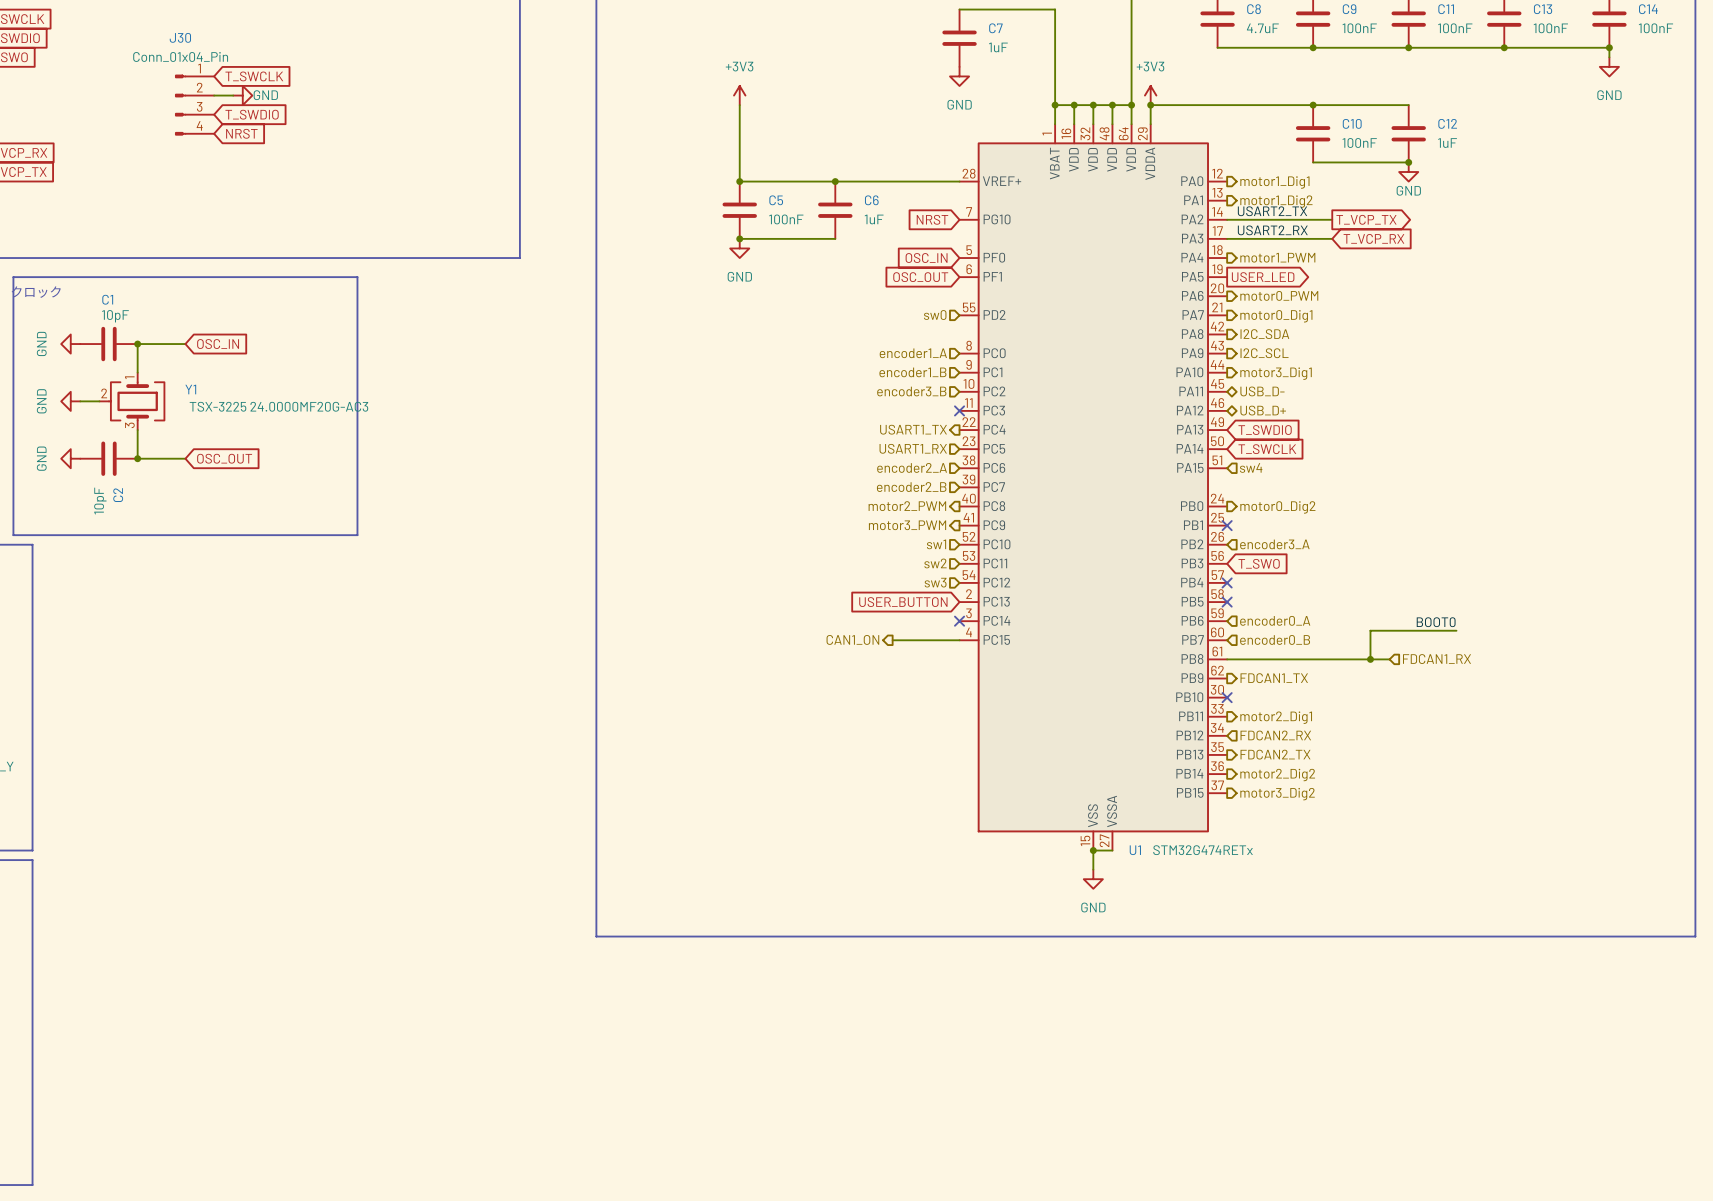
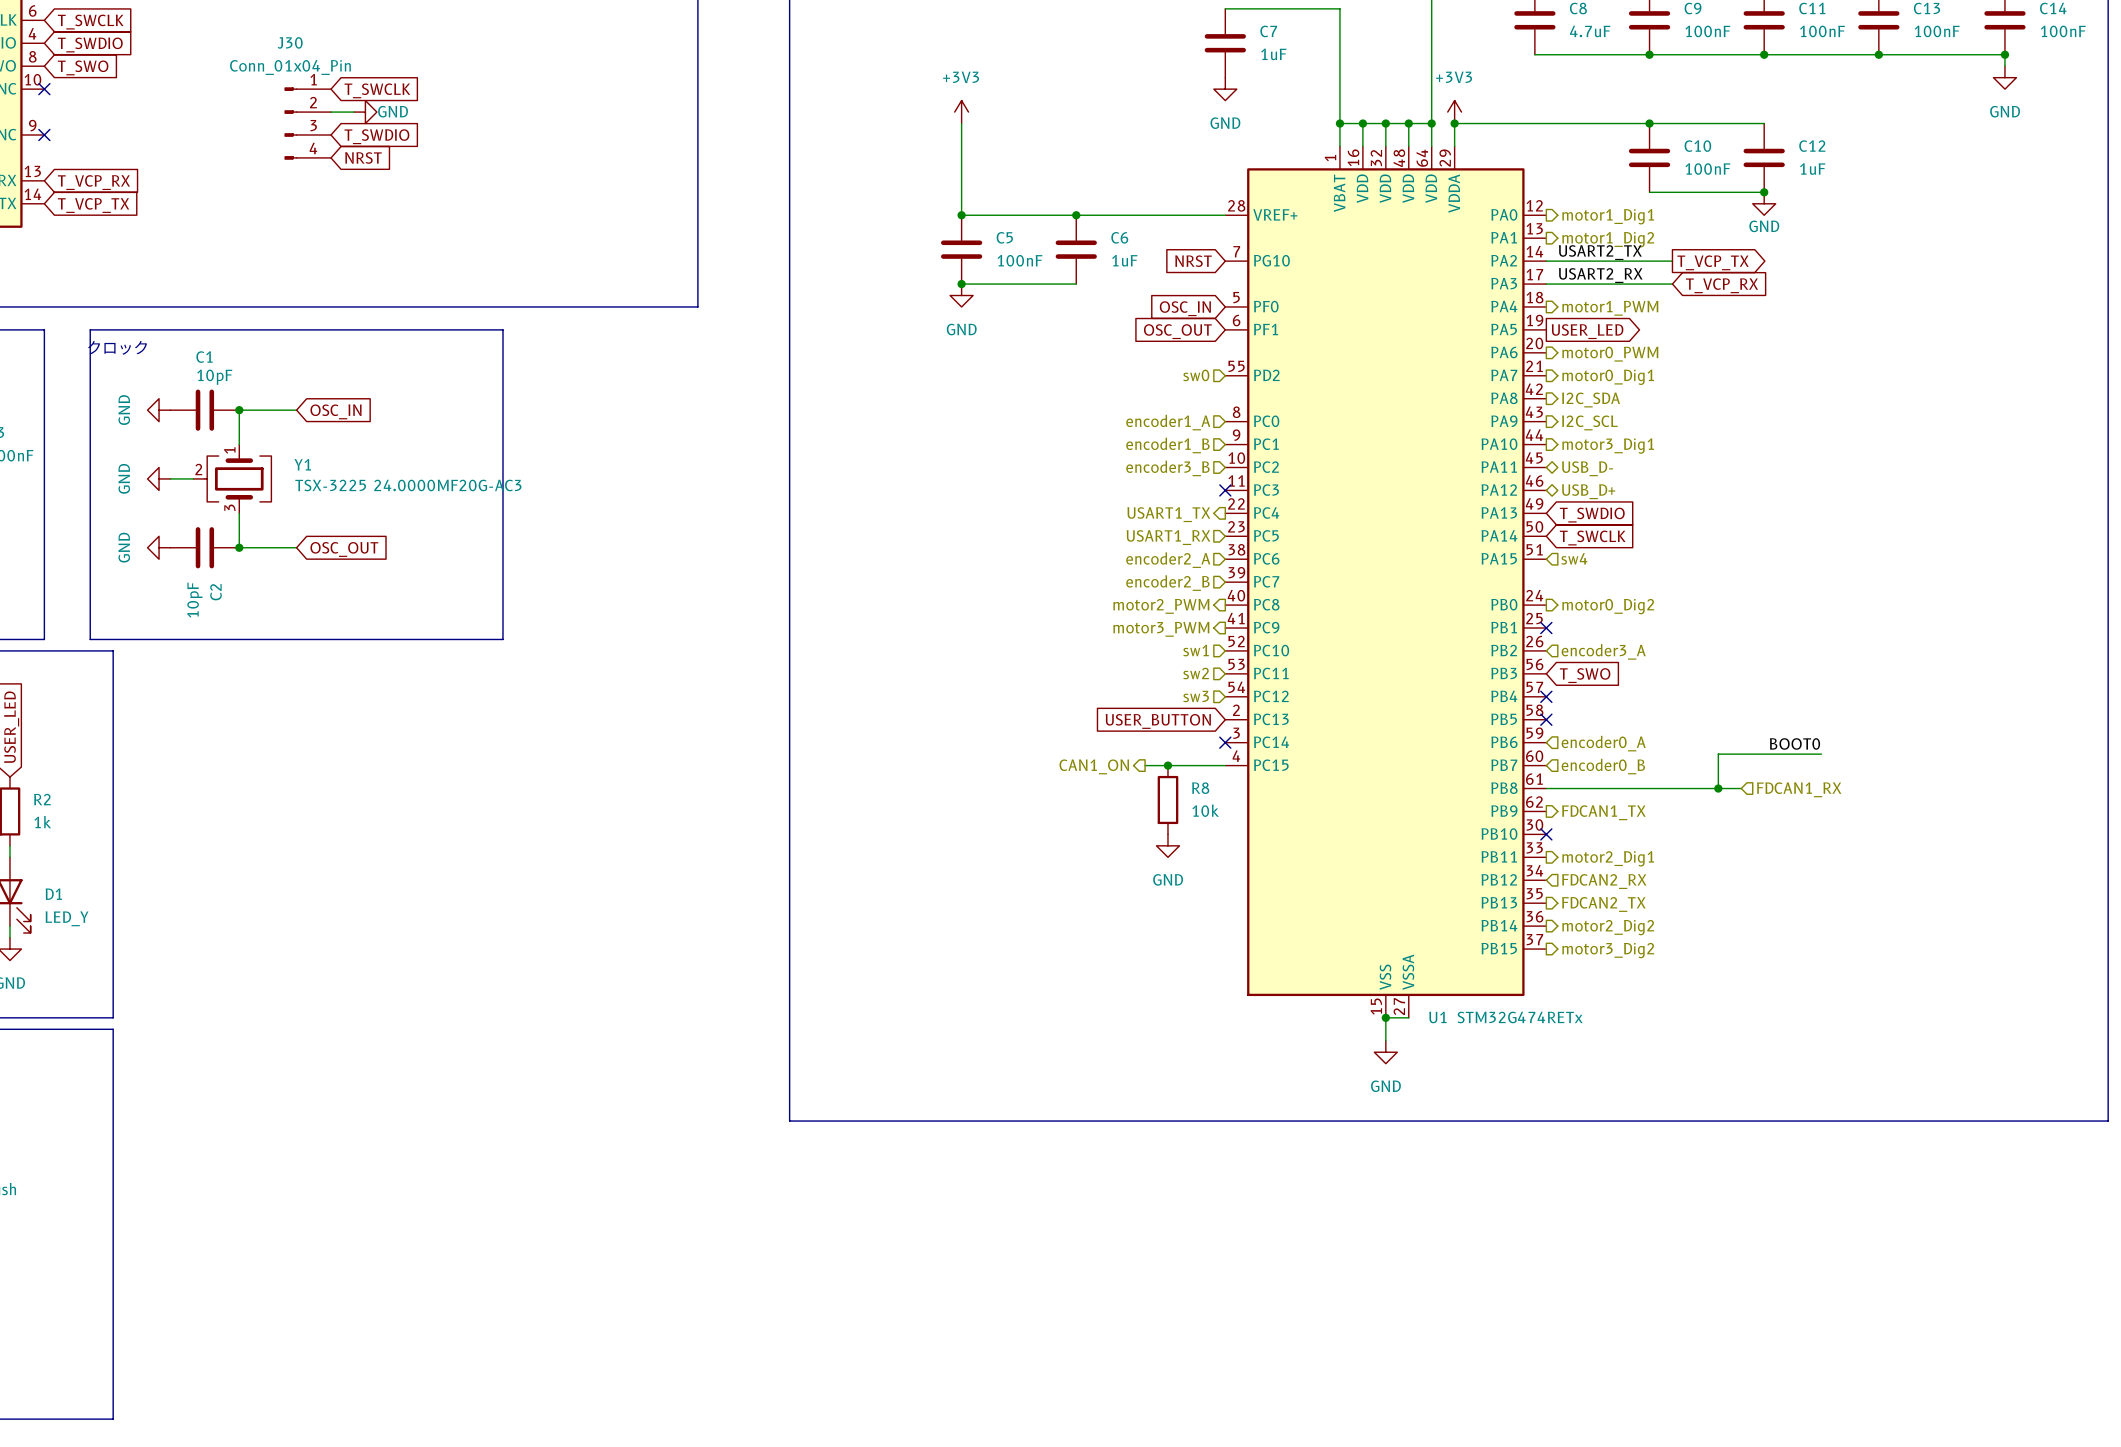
junction: none -> (1167, 765)
R8: none -> 10k (1167, 799)
power symbol: none -> GND (1167, 845)

